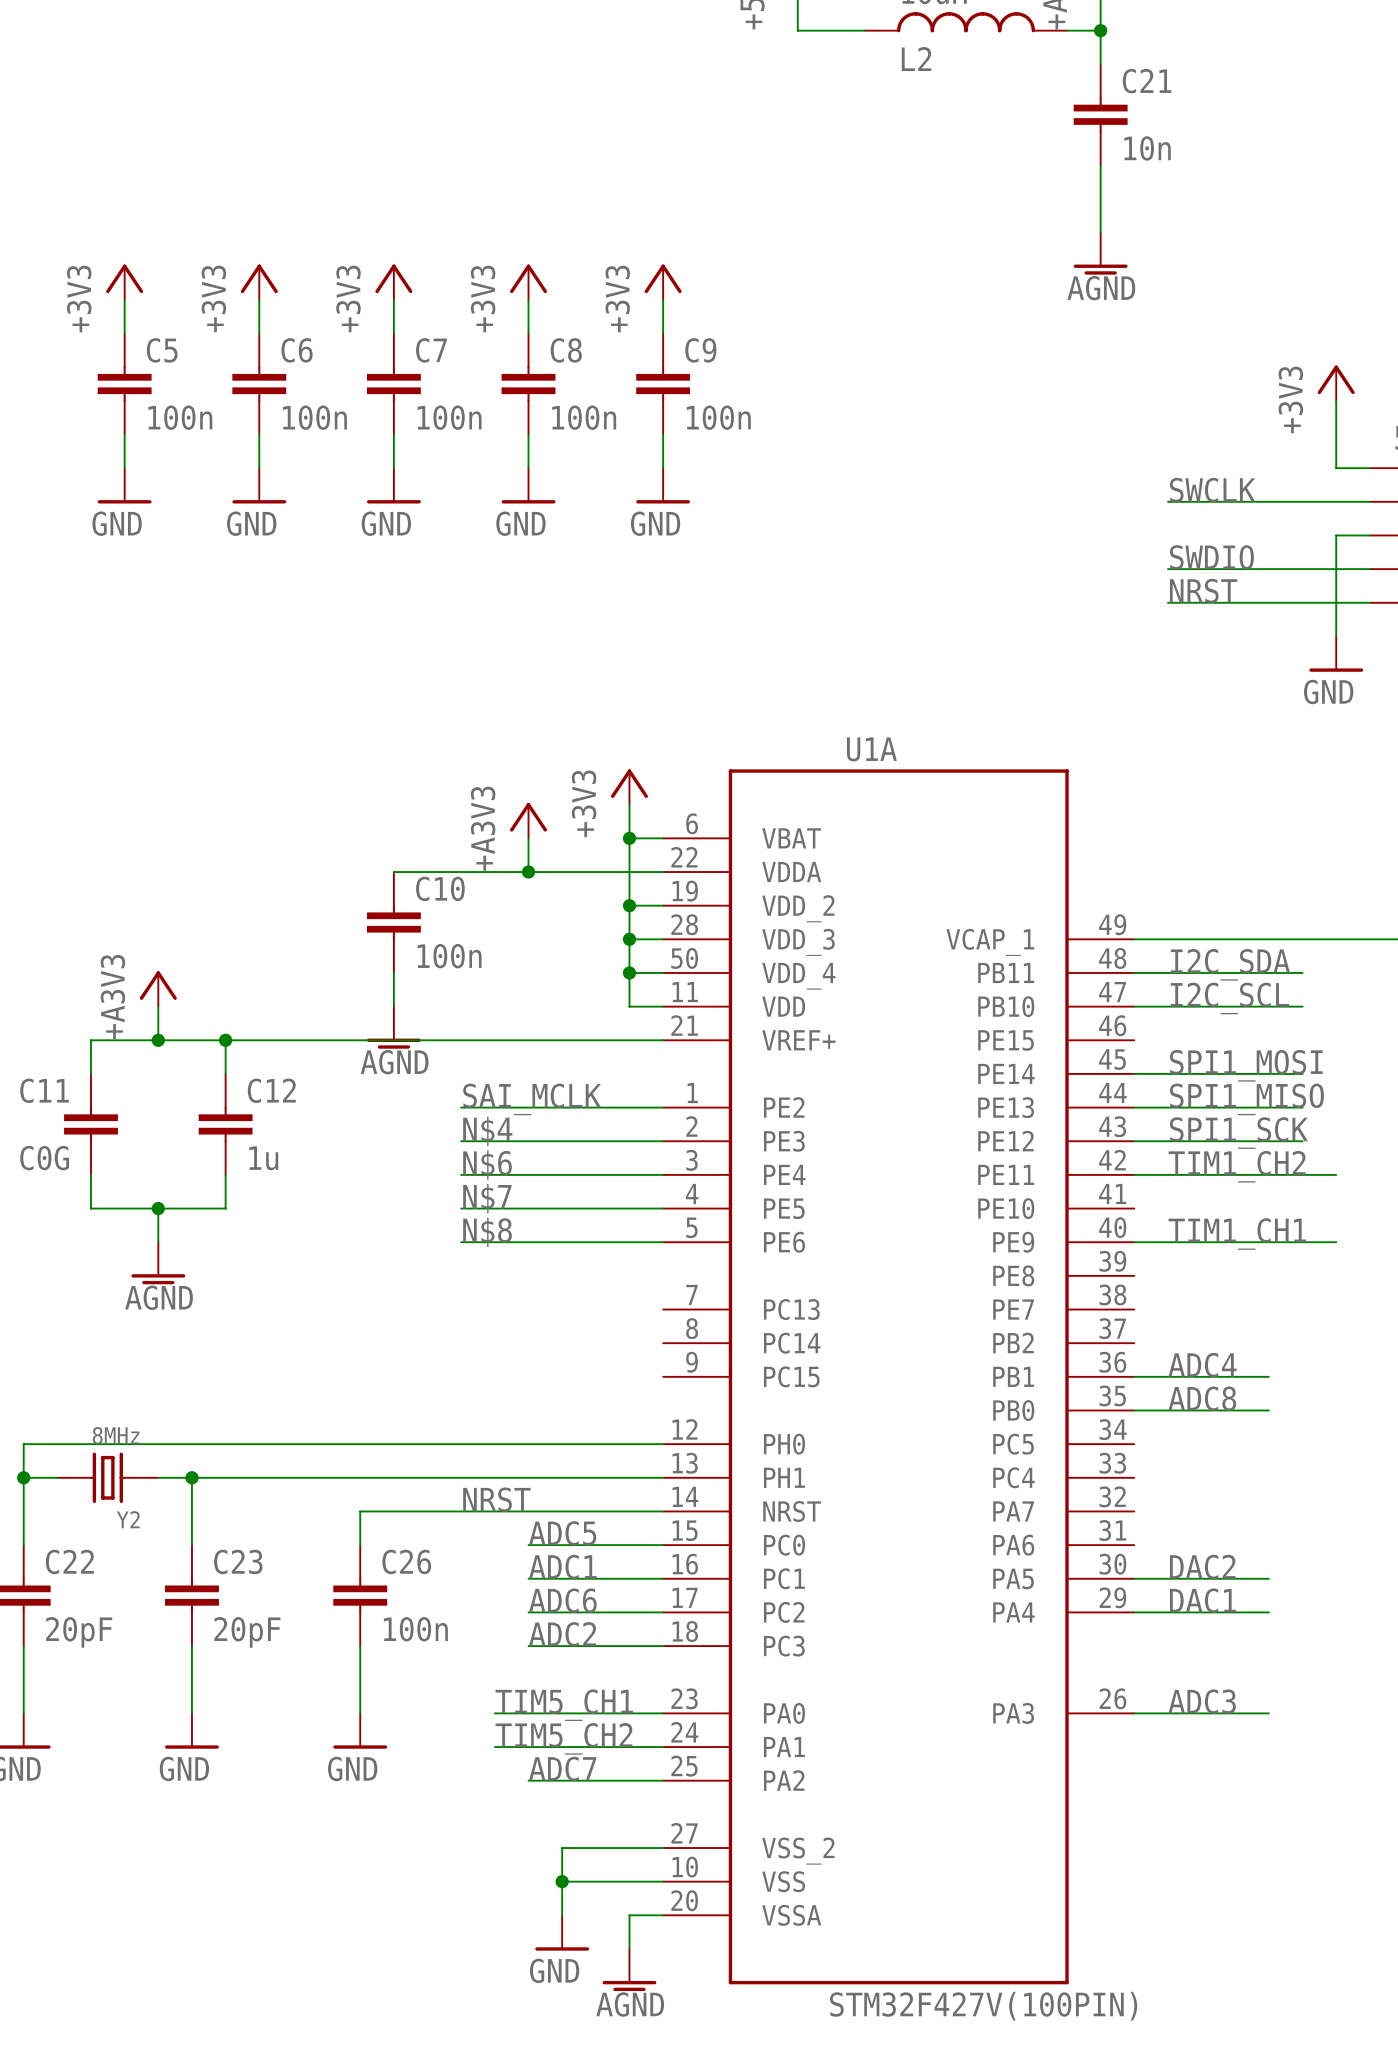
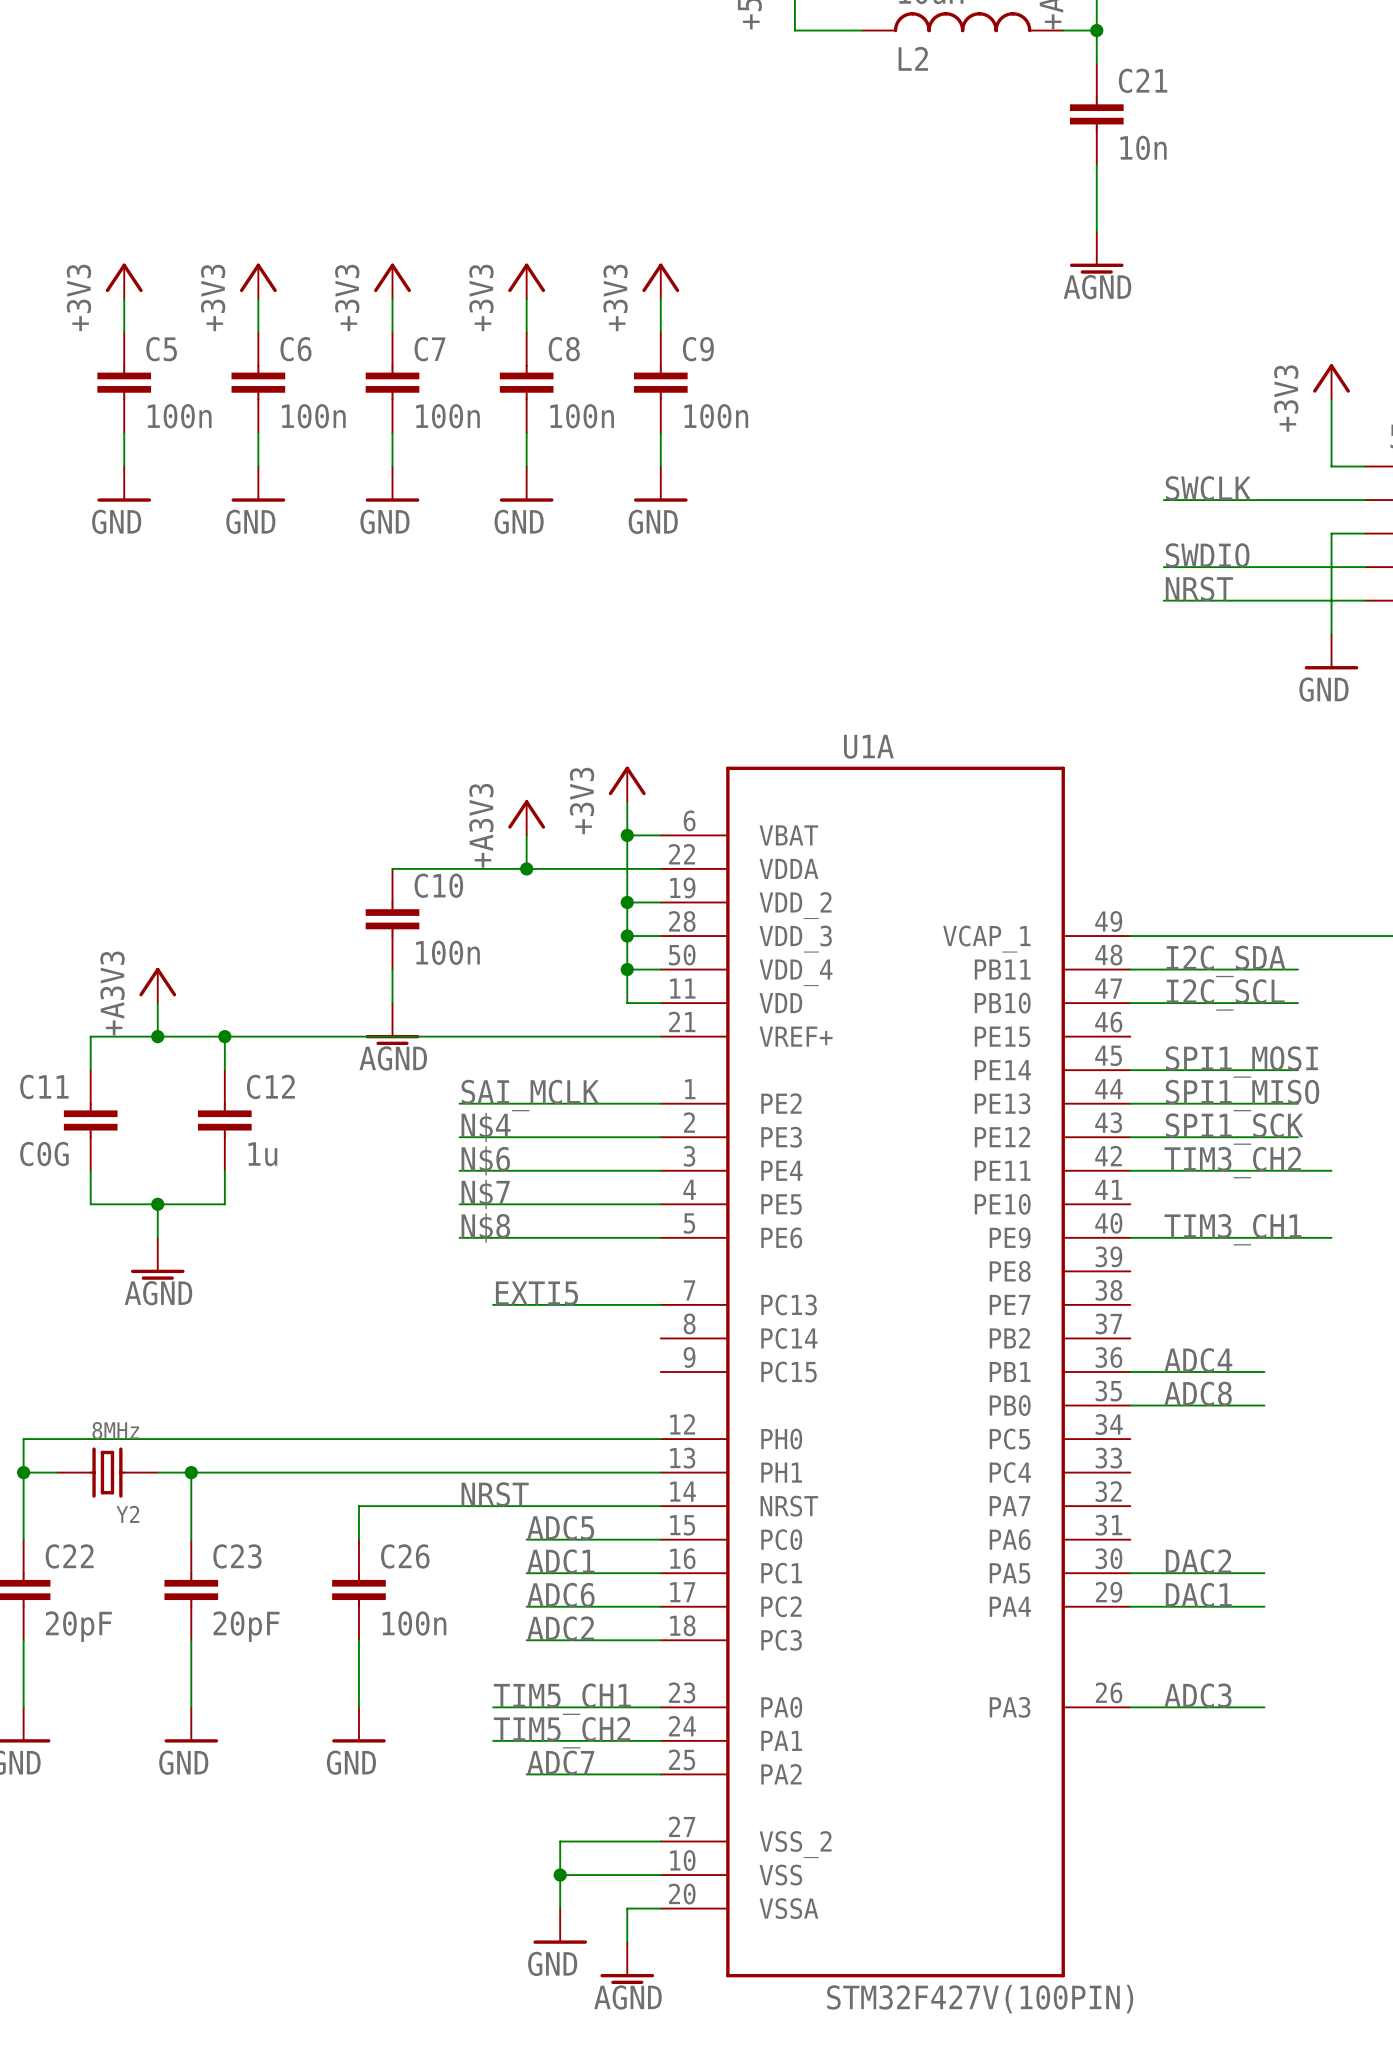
label: TIM1_CH2 (1237, 1166) -> TIM3_CH2 (1232, 1162)
label: TIM1_CH1 (1237, 1234) -> TIM3_CH1 (1232, 1229)
label: none -> EXTI5 (536, 1293)
wire: none -> (493, 1304) (660, 1304)

